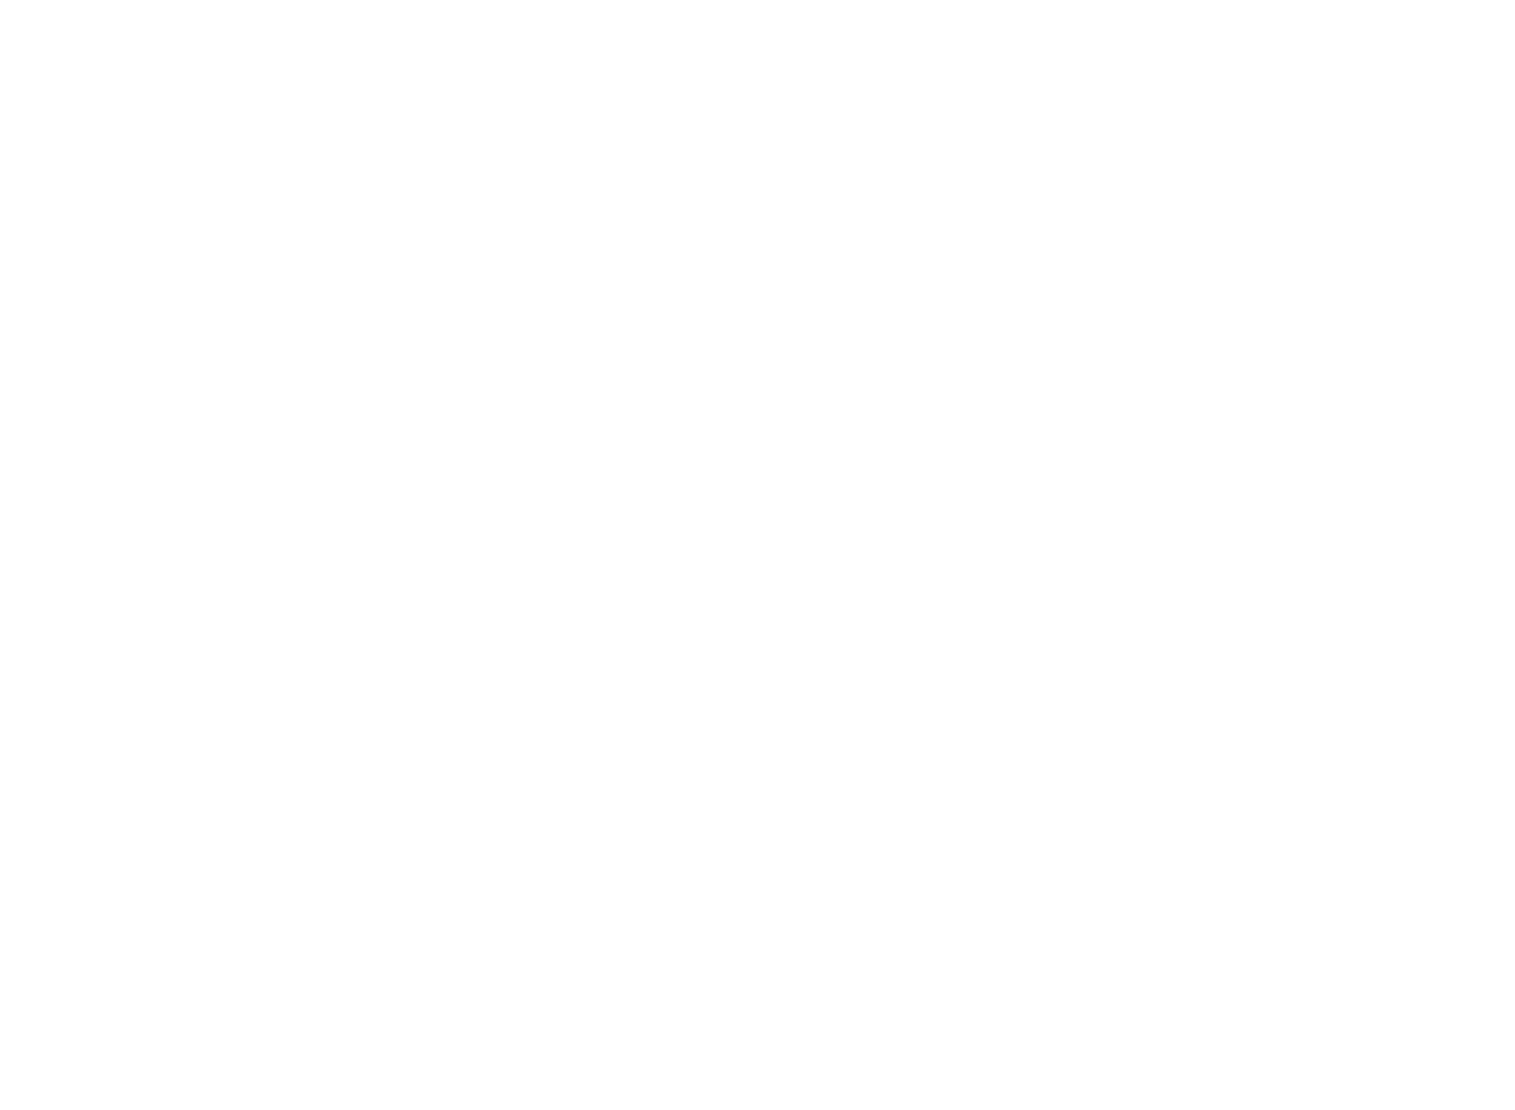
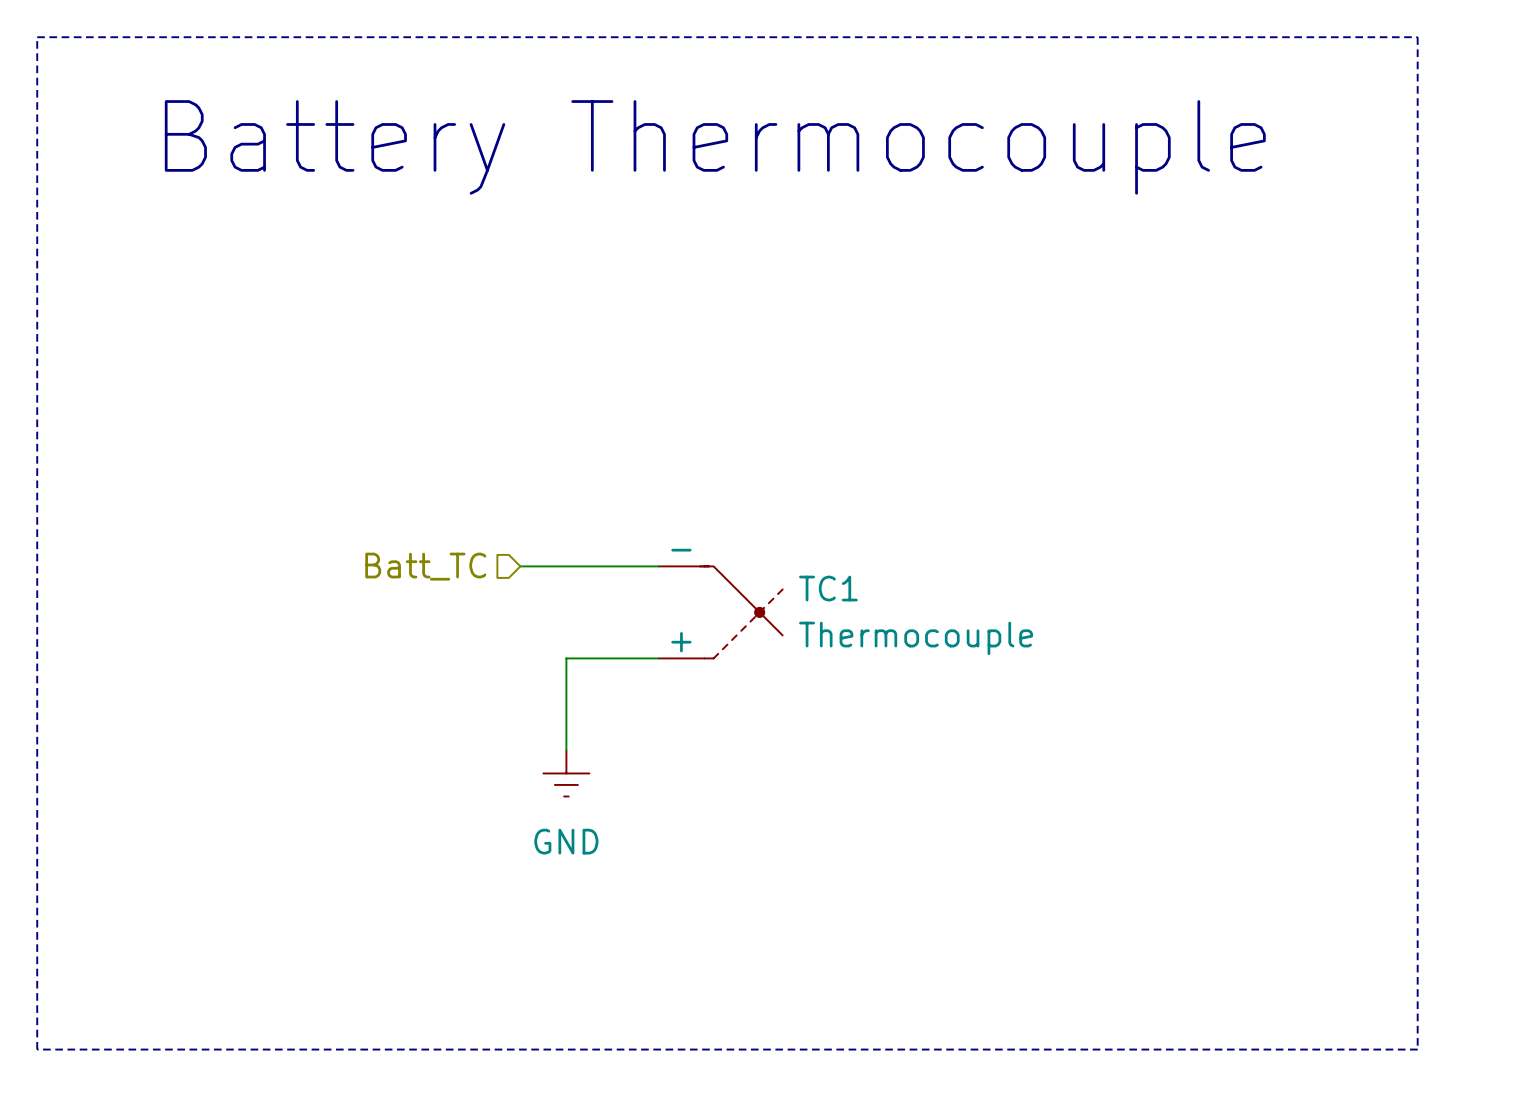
line: none -> (37, 37) (1417, 37) (1417, 1049) (37, 1049) (37, 37)
text: none -> Battery Thermocouple (715, 147)
hierarchical label: none -> Batt_TC (425, 566)
wire: none -> (520, 566) (658, 566)
TC1: none -> Thermocouple (720, 612)
wire: none -> (658, 658) (566, 658) (566, 750)
power symbol: none -> GND (566, 773)

